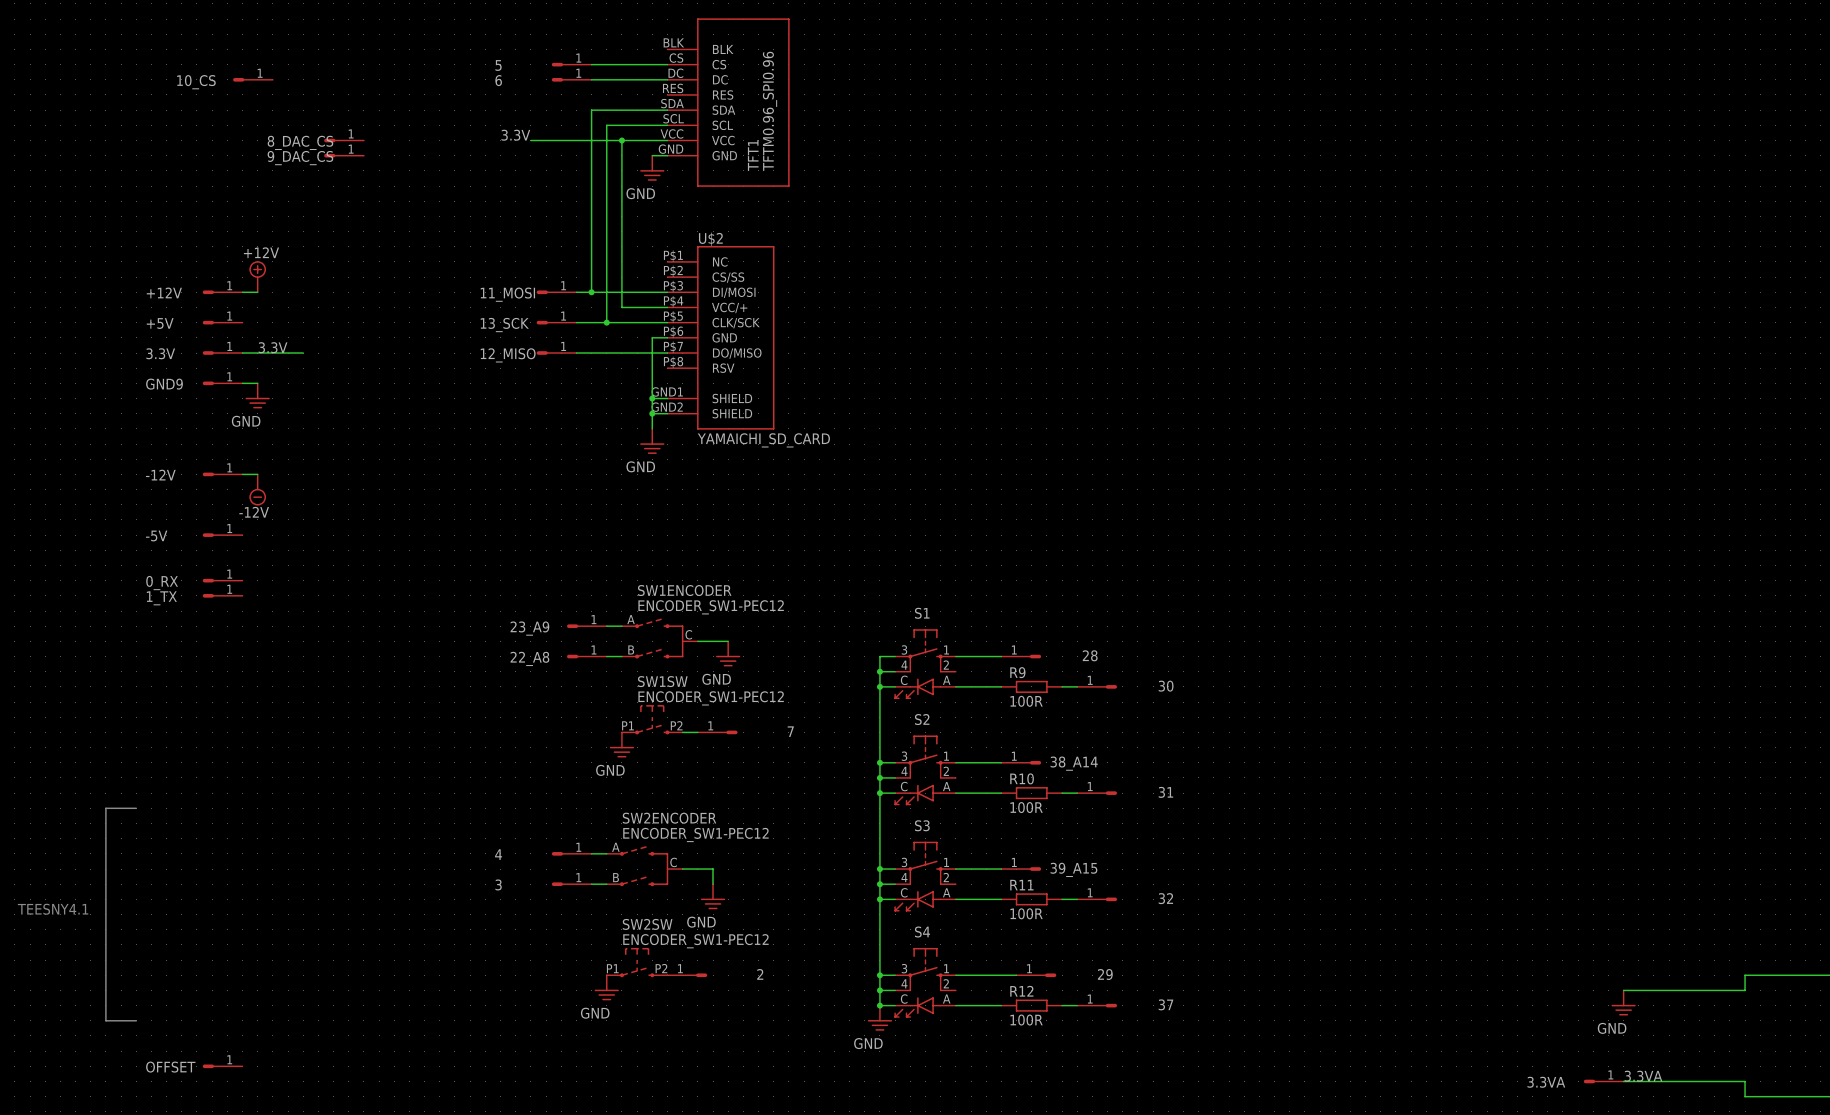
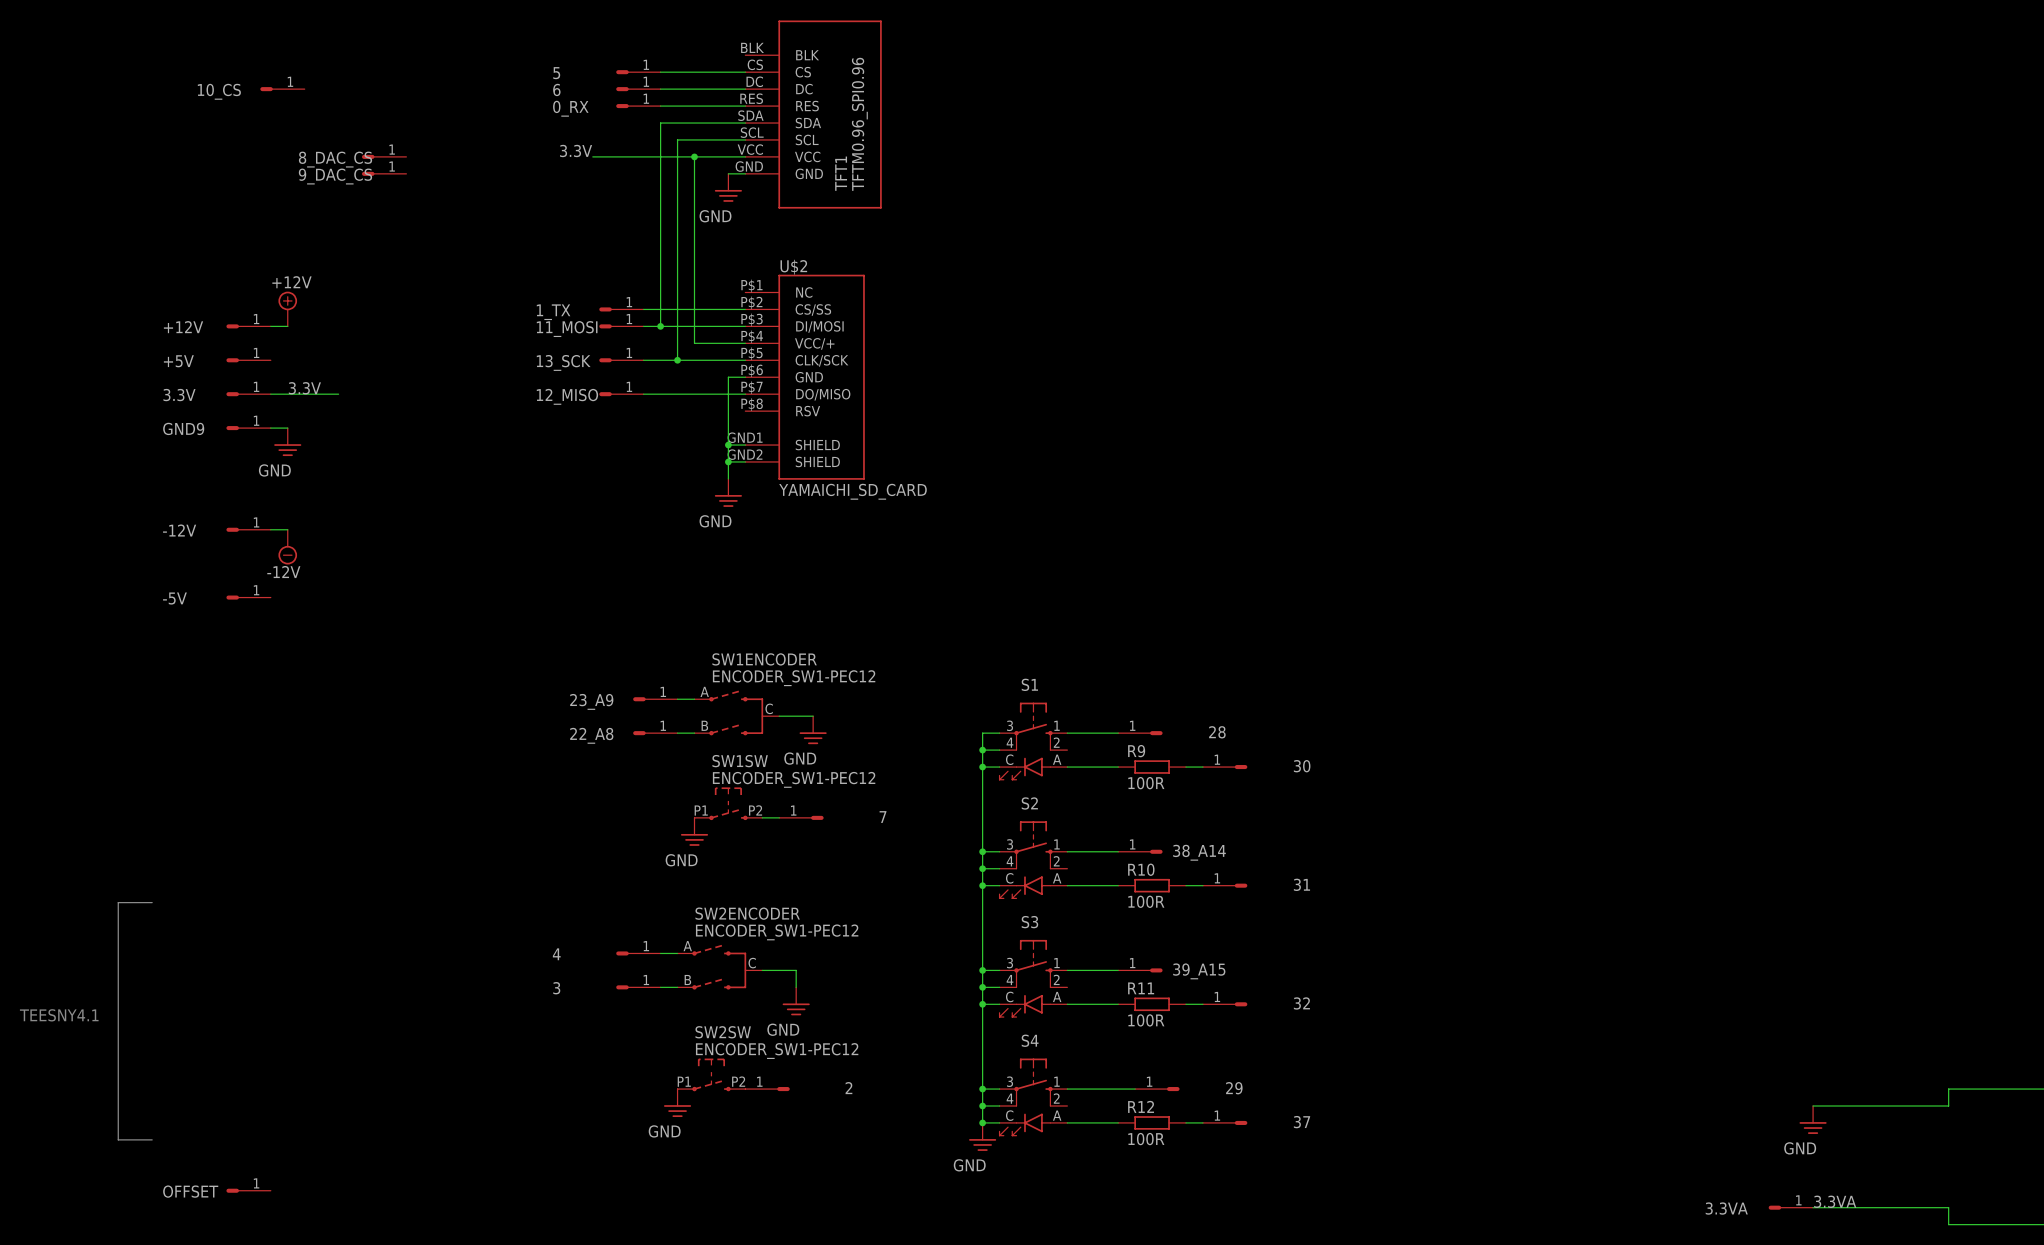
wire: none -> (660, 106) (745, 106)
wire: none -> (643, 309) (745, 309)
0_RX position: (222, 580) -> (638, 106)
1_TX position: (222, 595) -> (621, 309)

